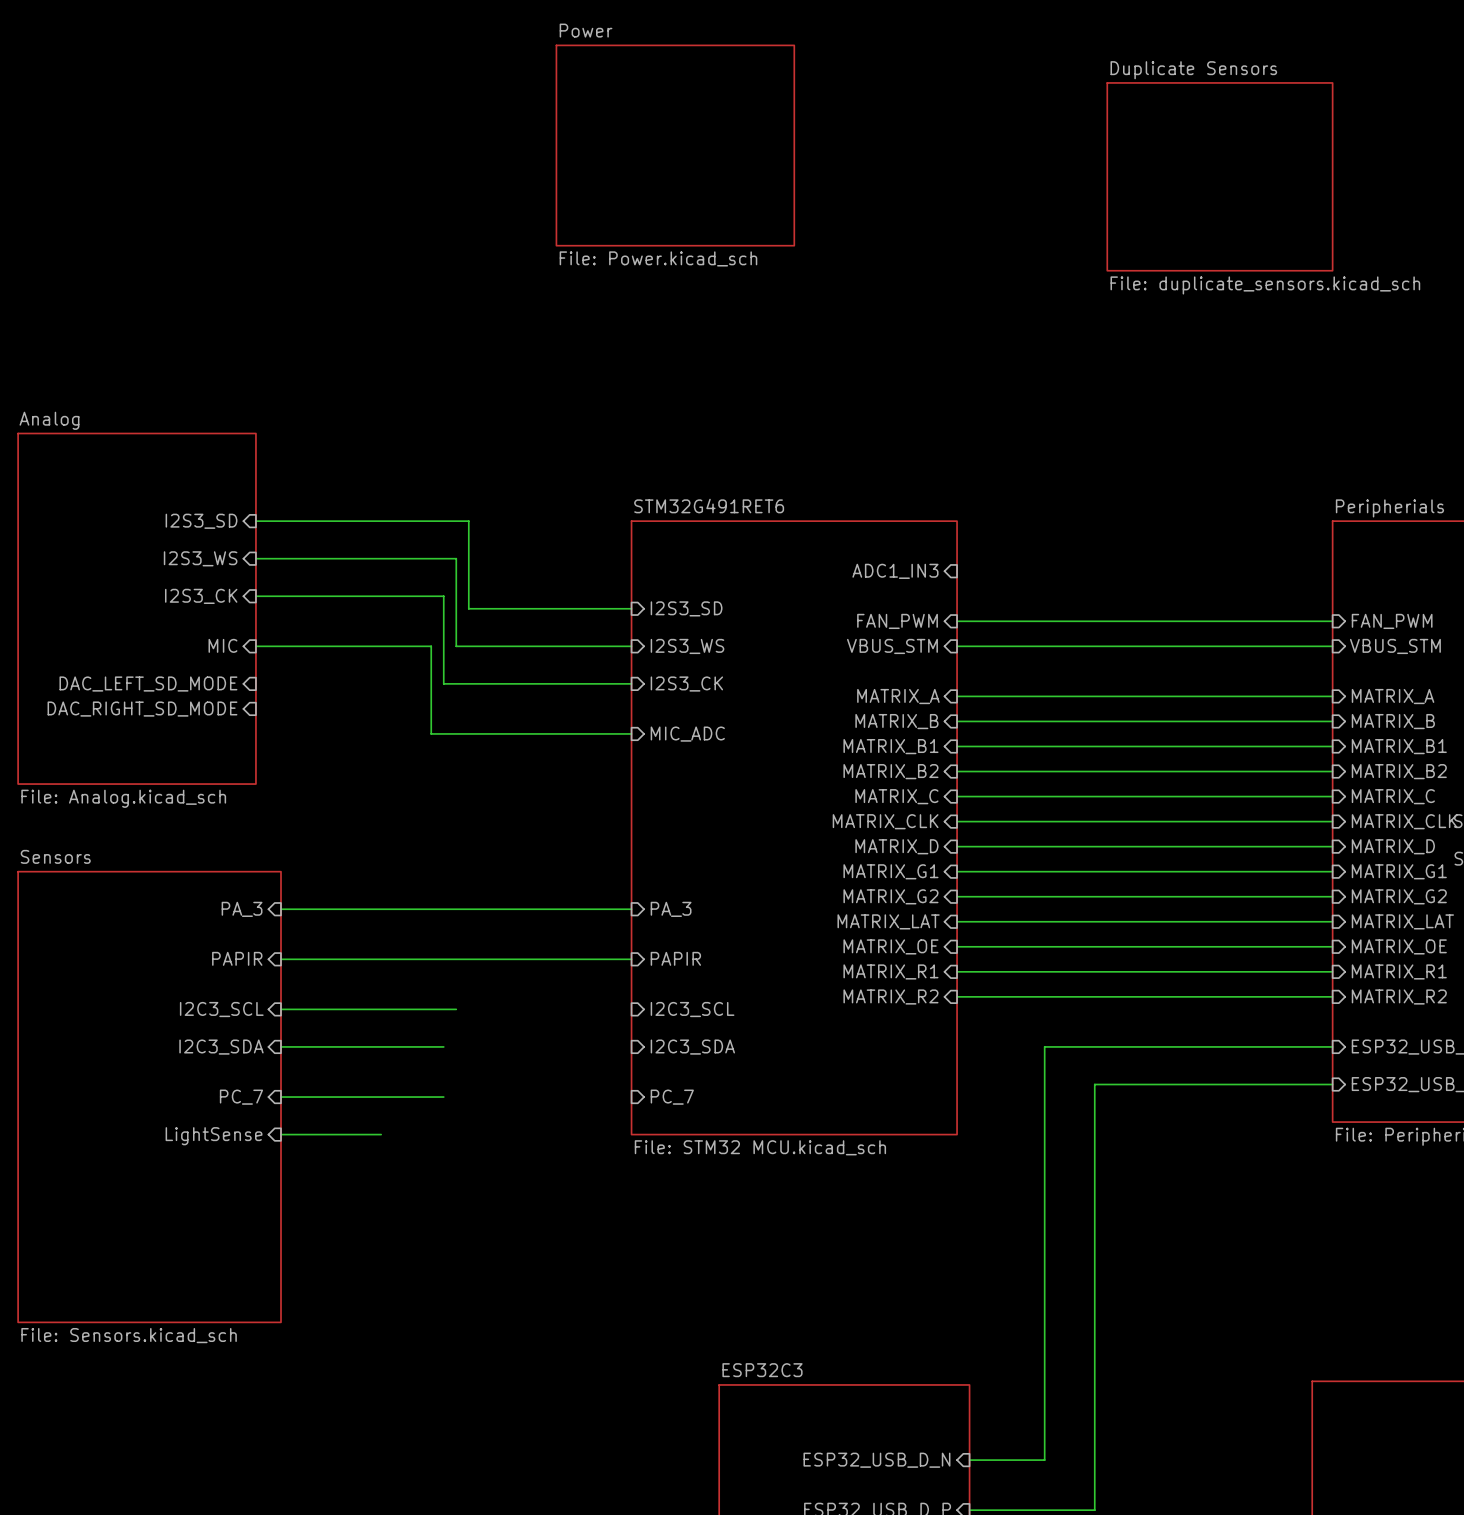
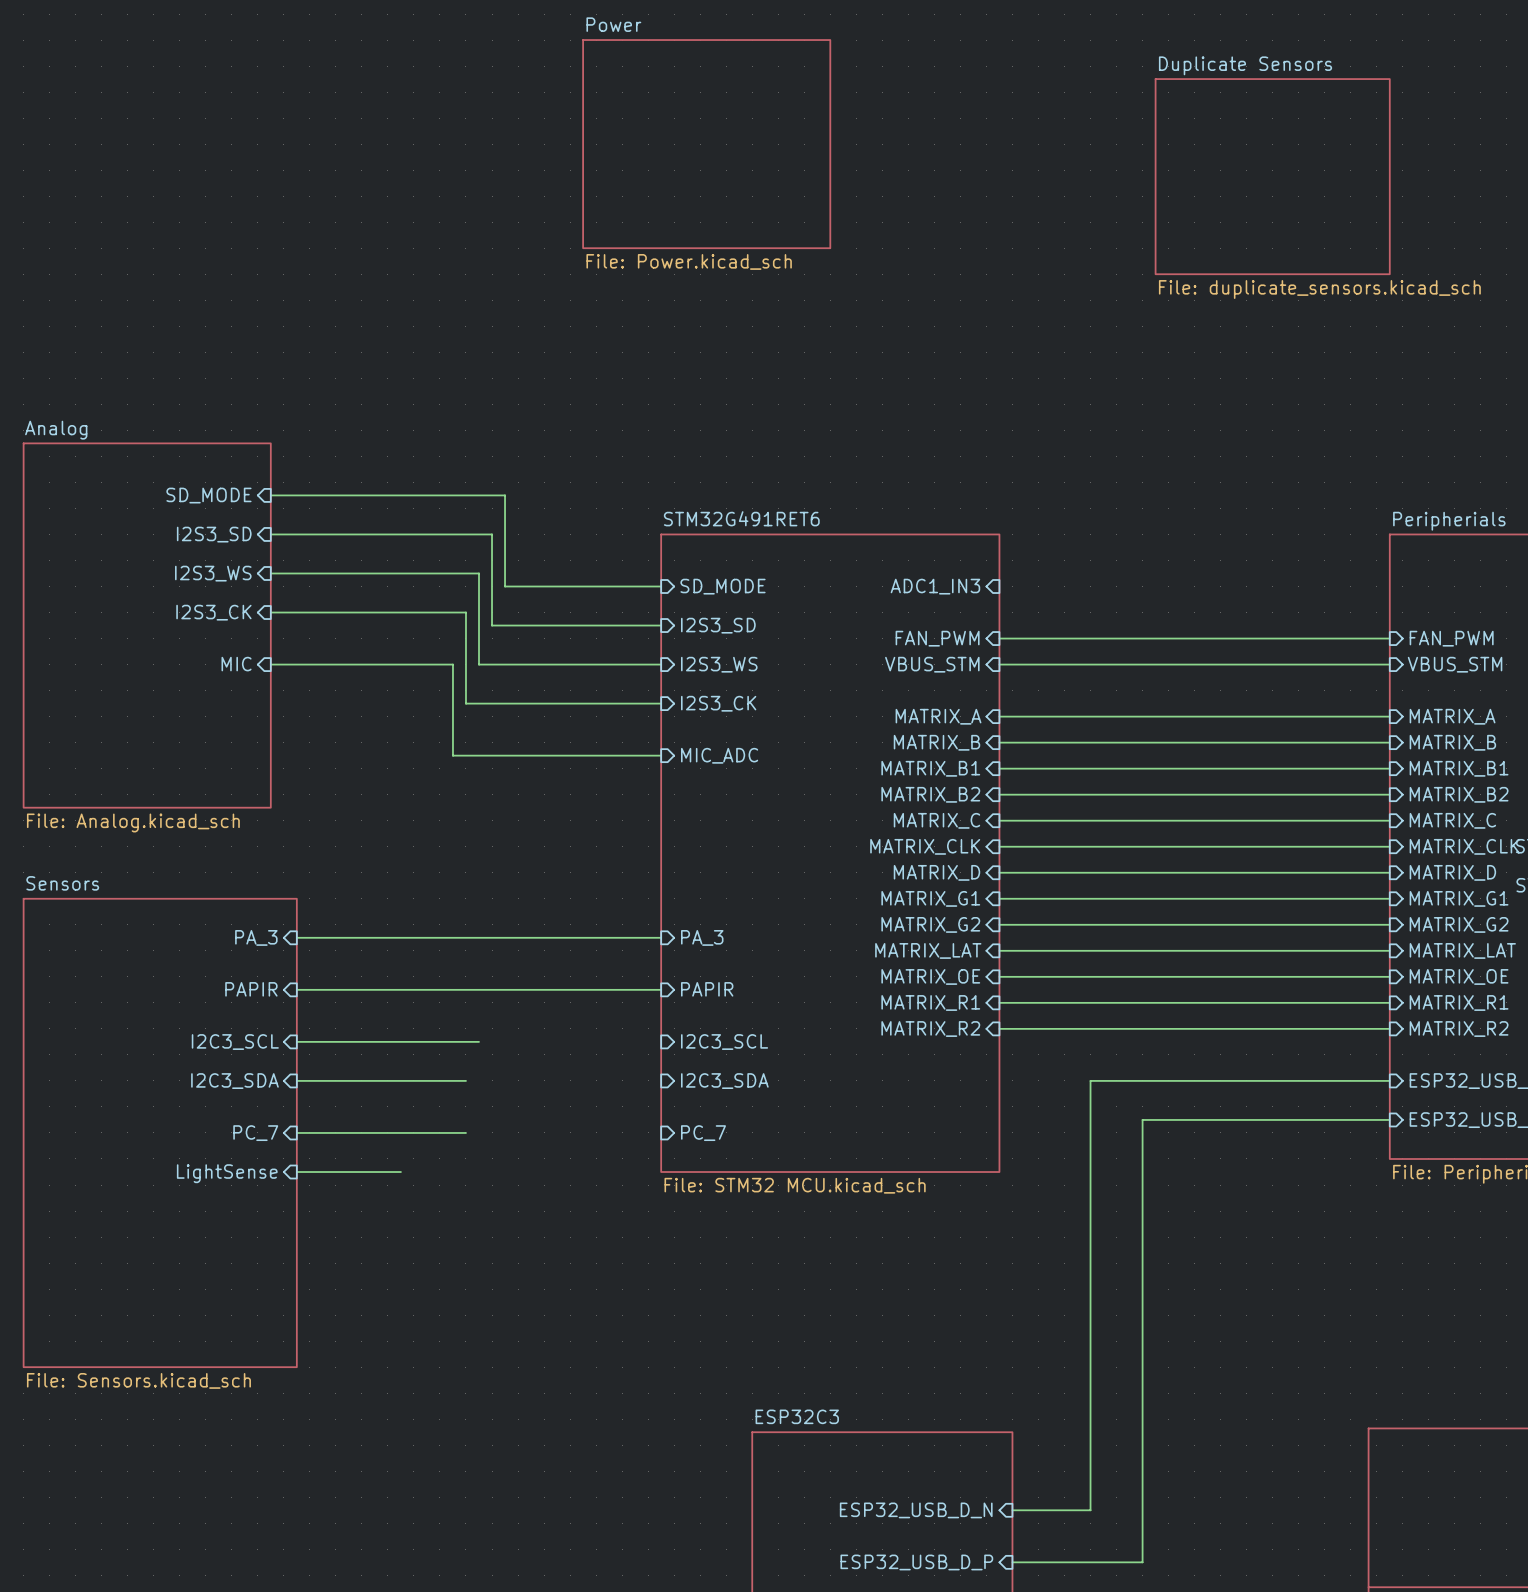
sheet pin: none -> SD_MODE (208, 495)
wire: none -> (270, 495) (505, 495) (505, 586) (661, 586)
sheet pin: none -> SD_MODE (723, 586)
sheet pin: DAC_LEFT_SD_MODE (148, 684) -> none
sheet pin: DAC_RIGHT_SD_MODE (142, 709) -> none

